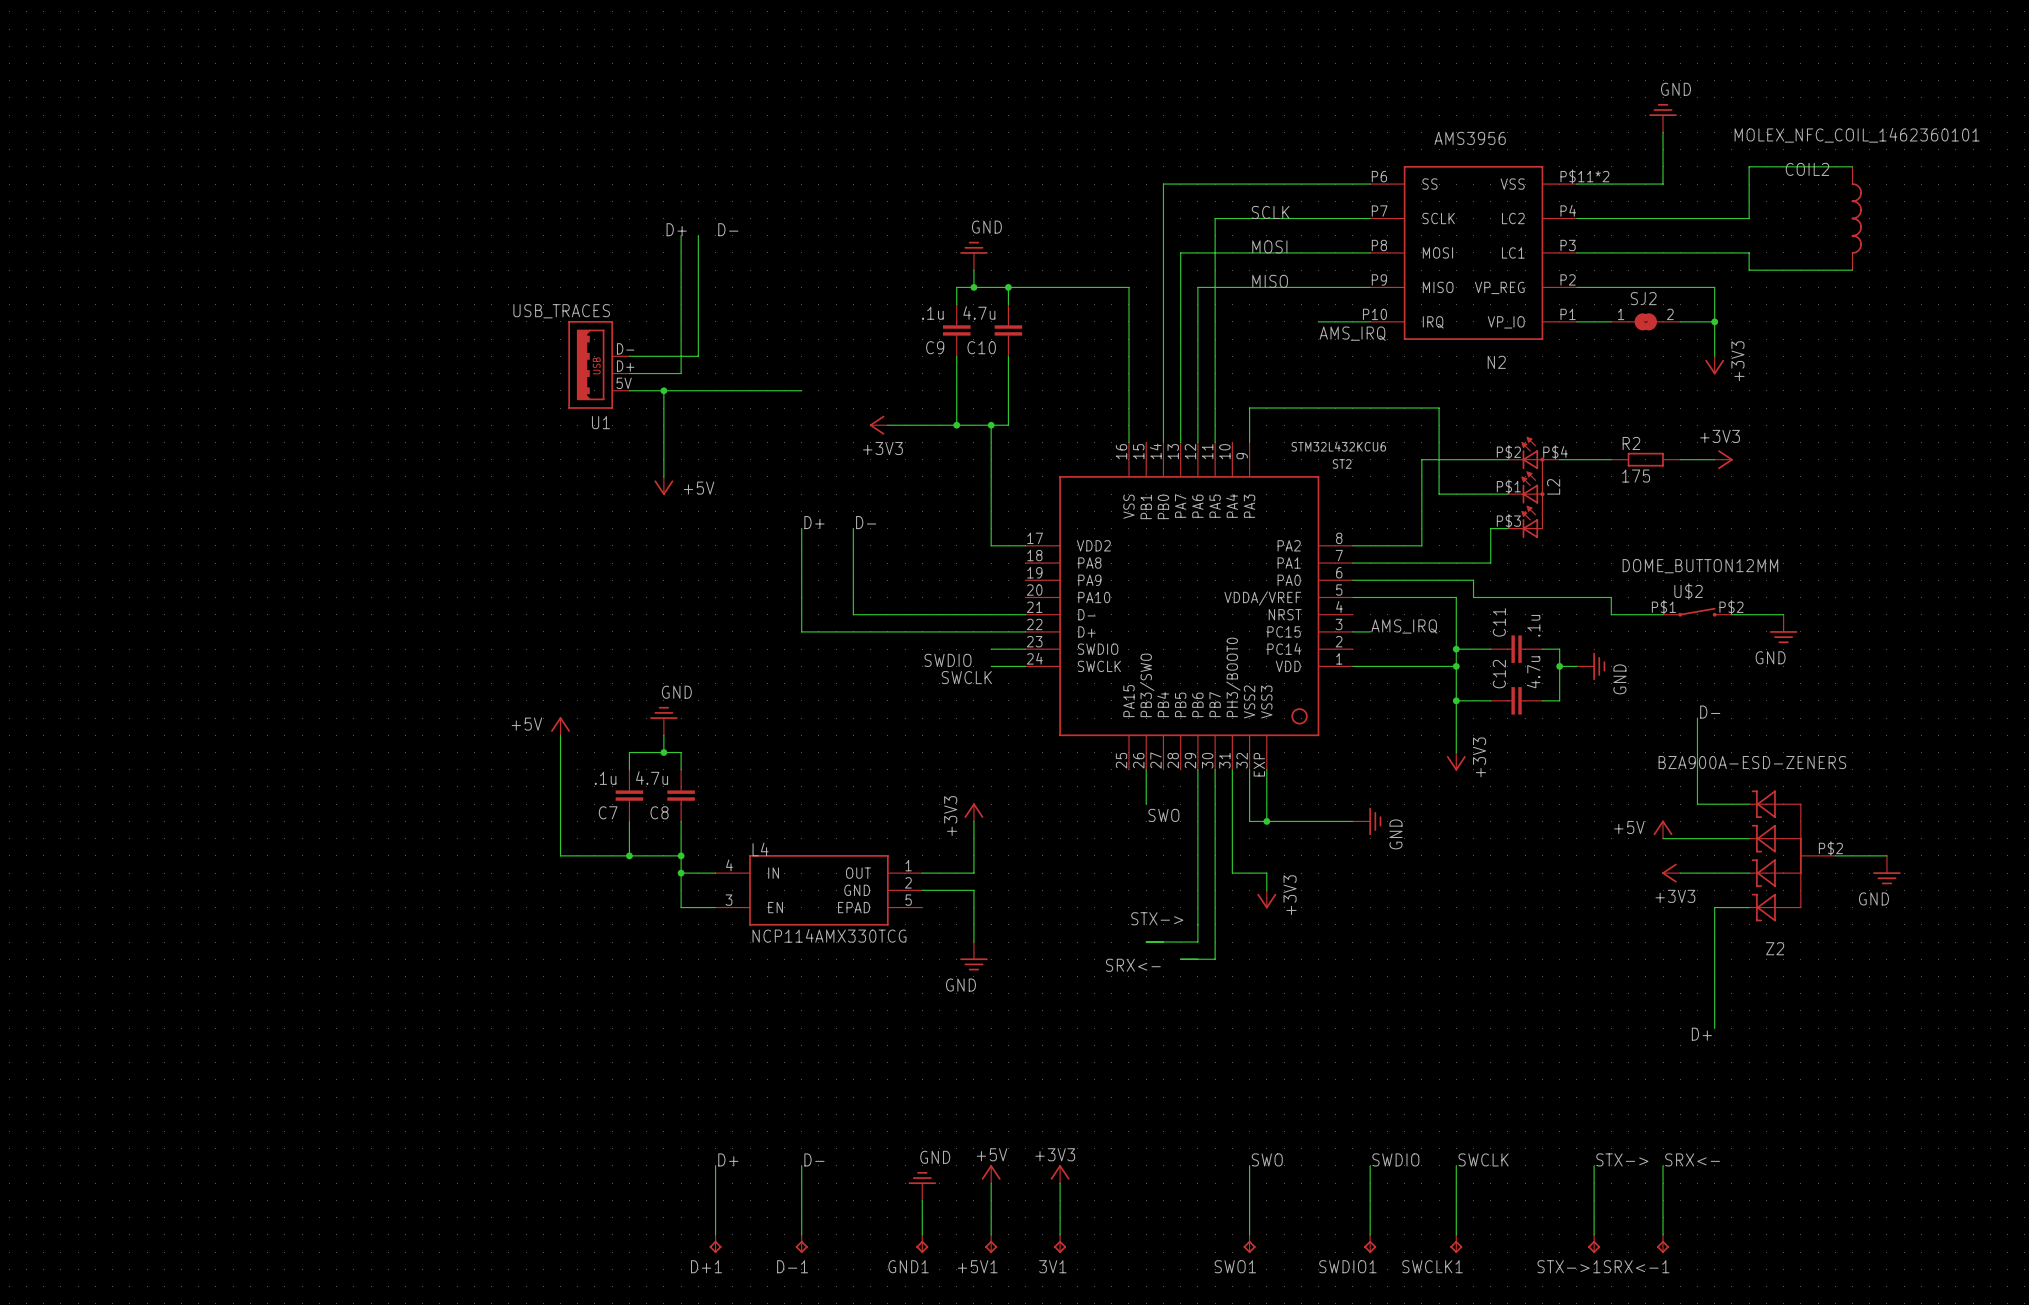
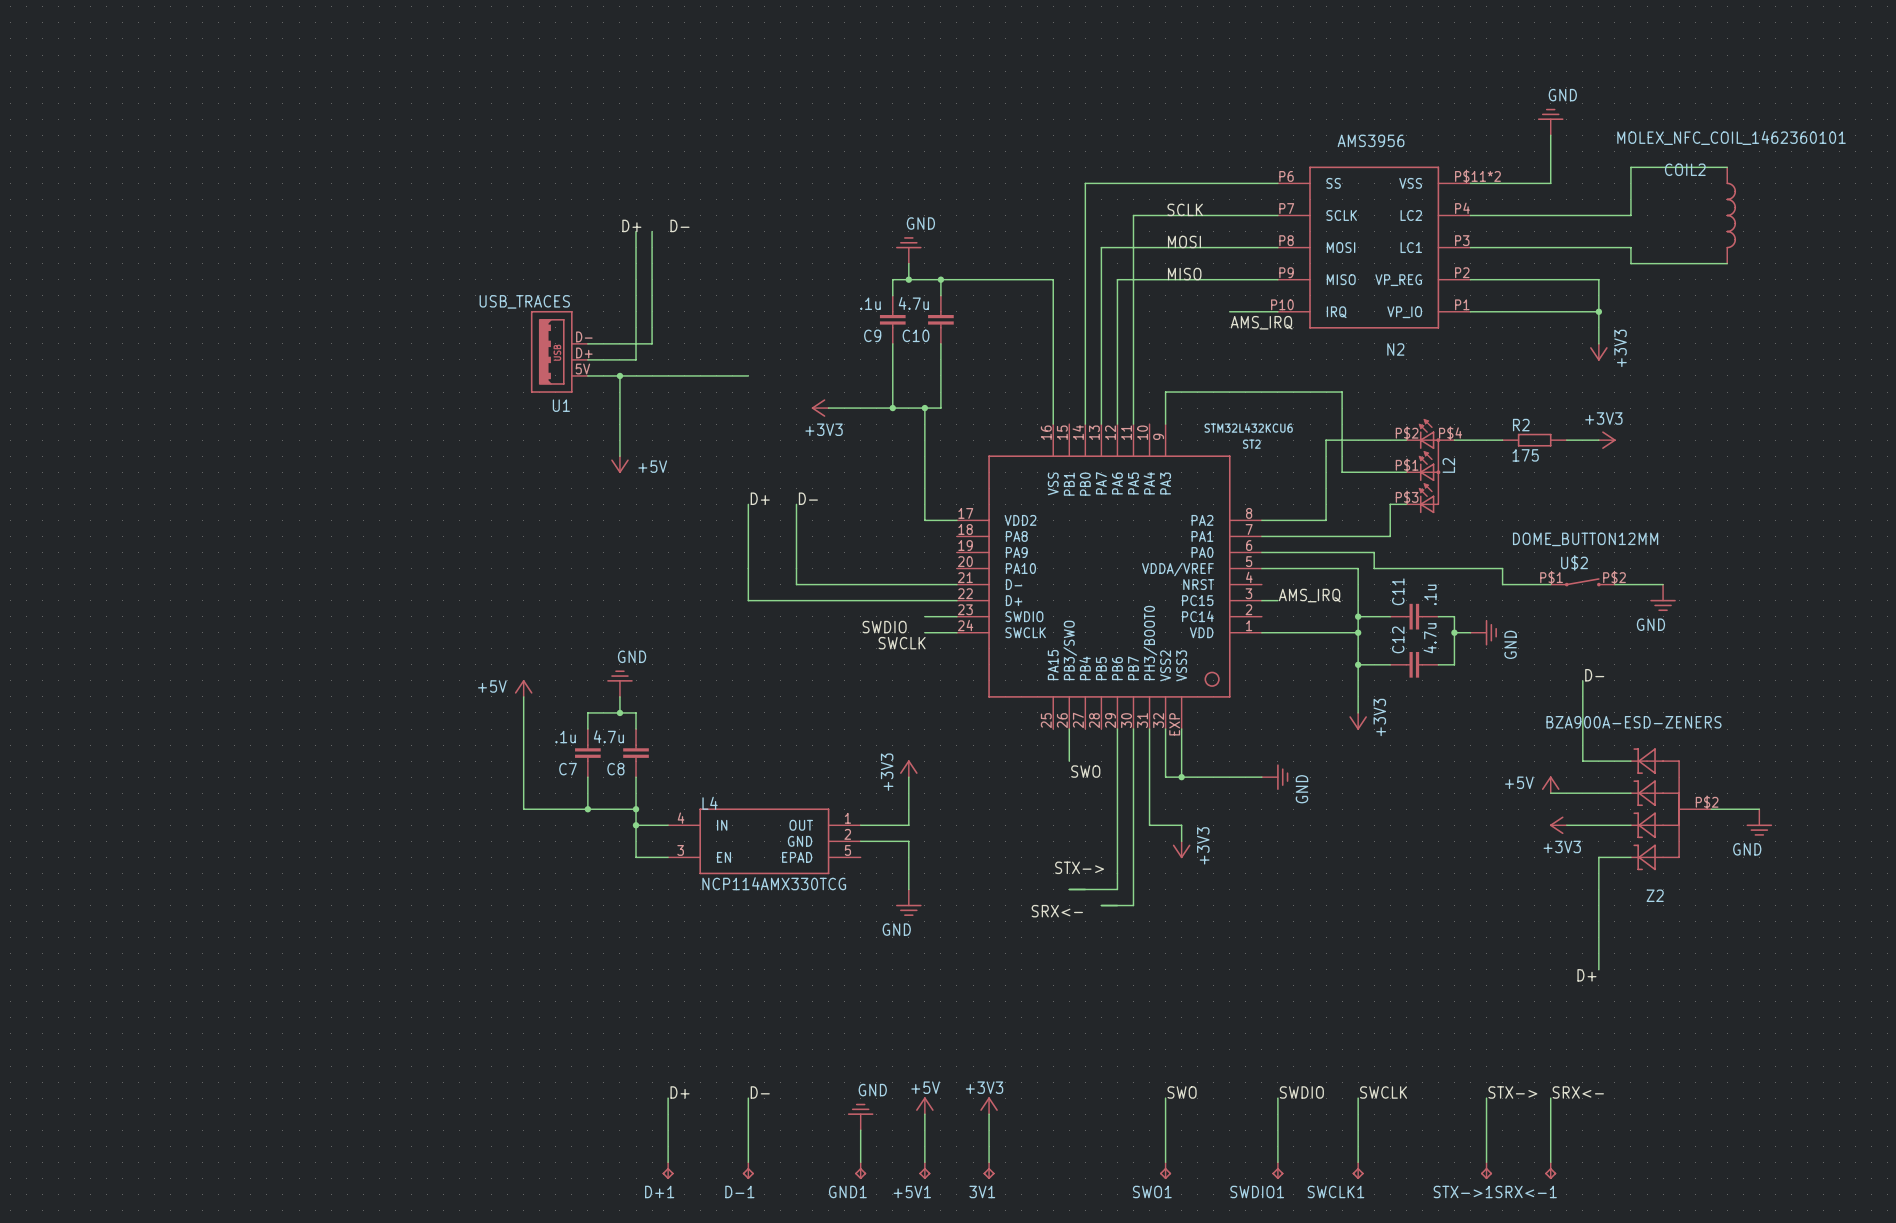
SJ2: (1645, 321) -> none

